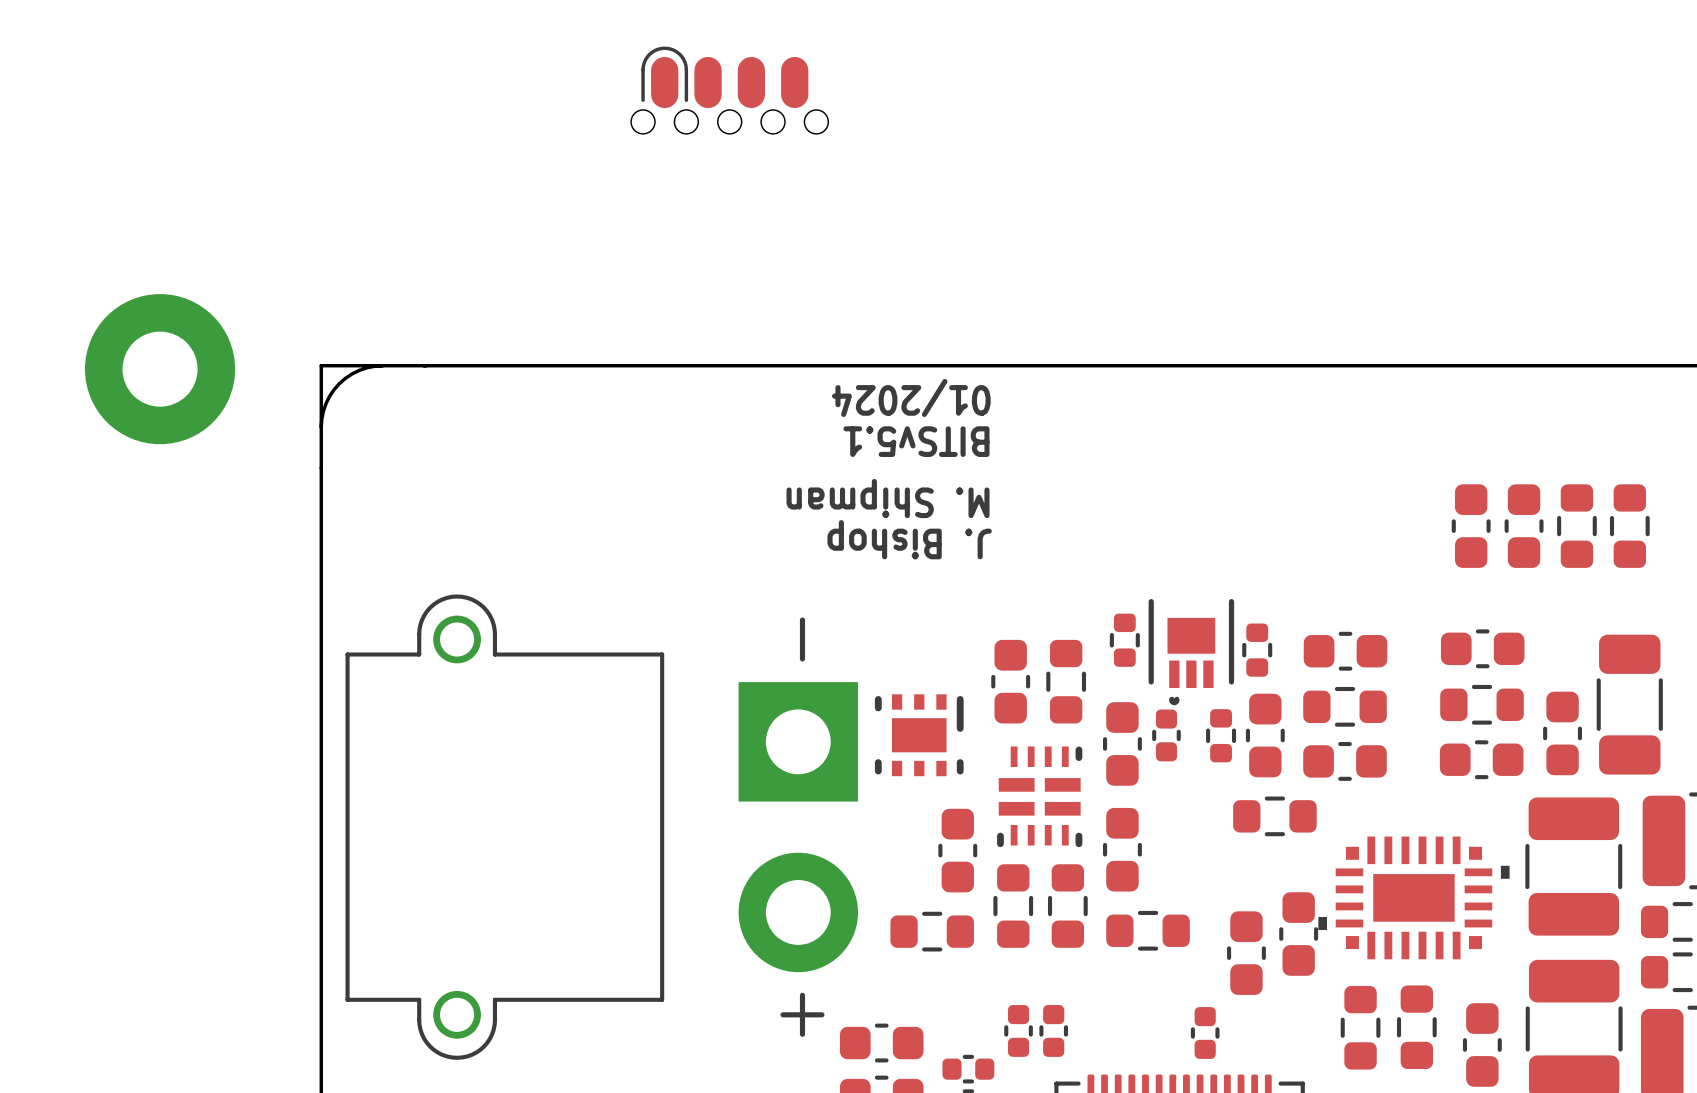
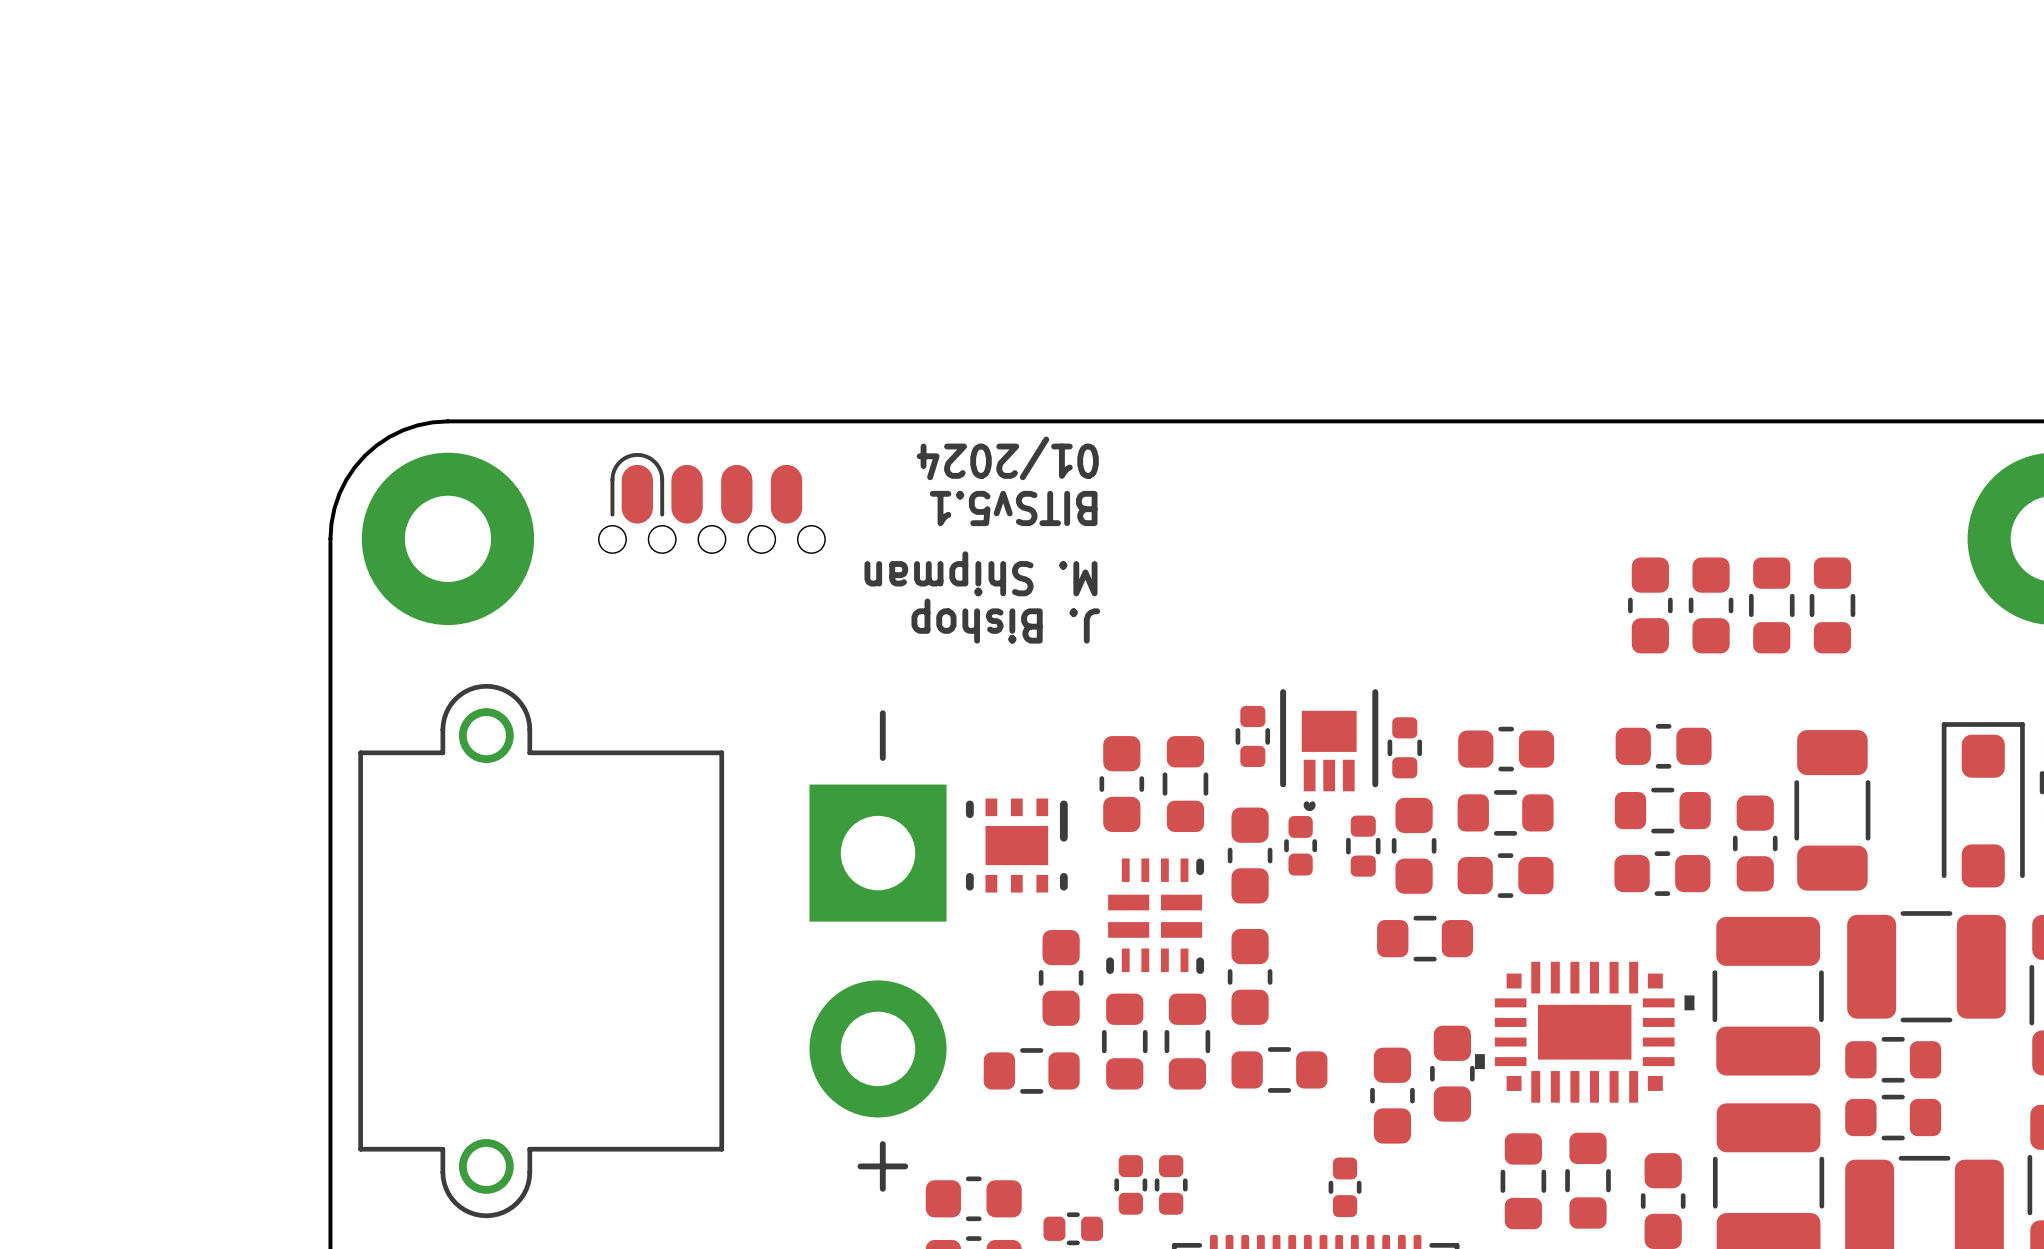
part position: (729, 90) -> (711, 503)
board edge: (382, 365) (359, 370) (339, 383) (325, 403) (321, 427) -> none
board edge: (423, 365) (321, 365) (321, 468) -> (447, 421) (432, 422) (402, 430) (376, 445) (364, 455) (354, 467) (339, 493) (334, 508) (330, 538)
part position: (160, 369) -> (447, 538)

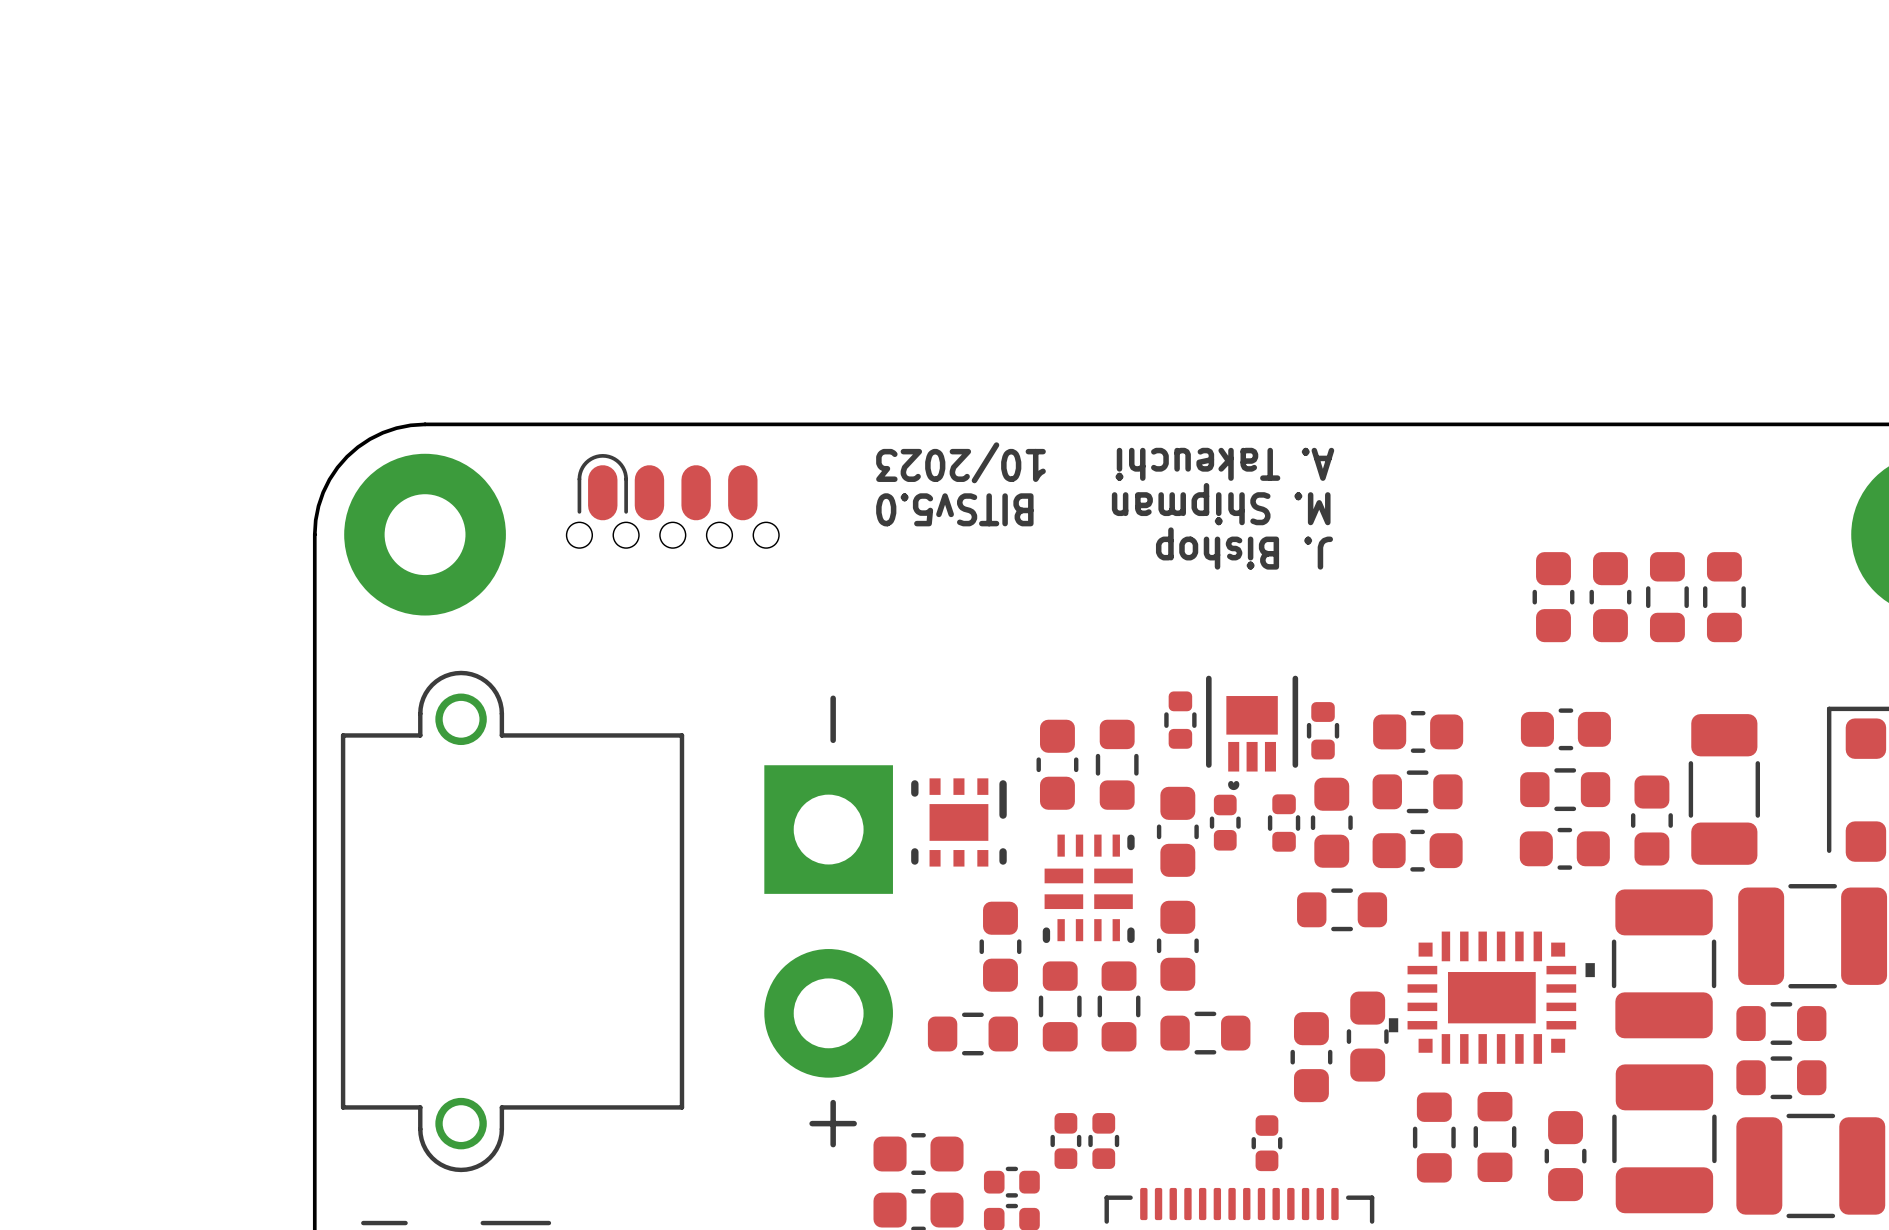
text: 01/2024 (1007, 458) -> 10/2023 (960, 462)
text: none -> A. Takeuchi (1224, 464)
text: BITSv5.1 (1013, 508) -> BITSv5.0 (954, 509)
text position: M. Shipman (981, 573) -> M. Shipman (1221, 504)
text position: J. Bishop (1005, 621) -> J. Bishop (1244, 548)

